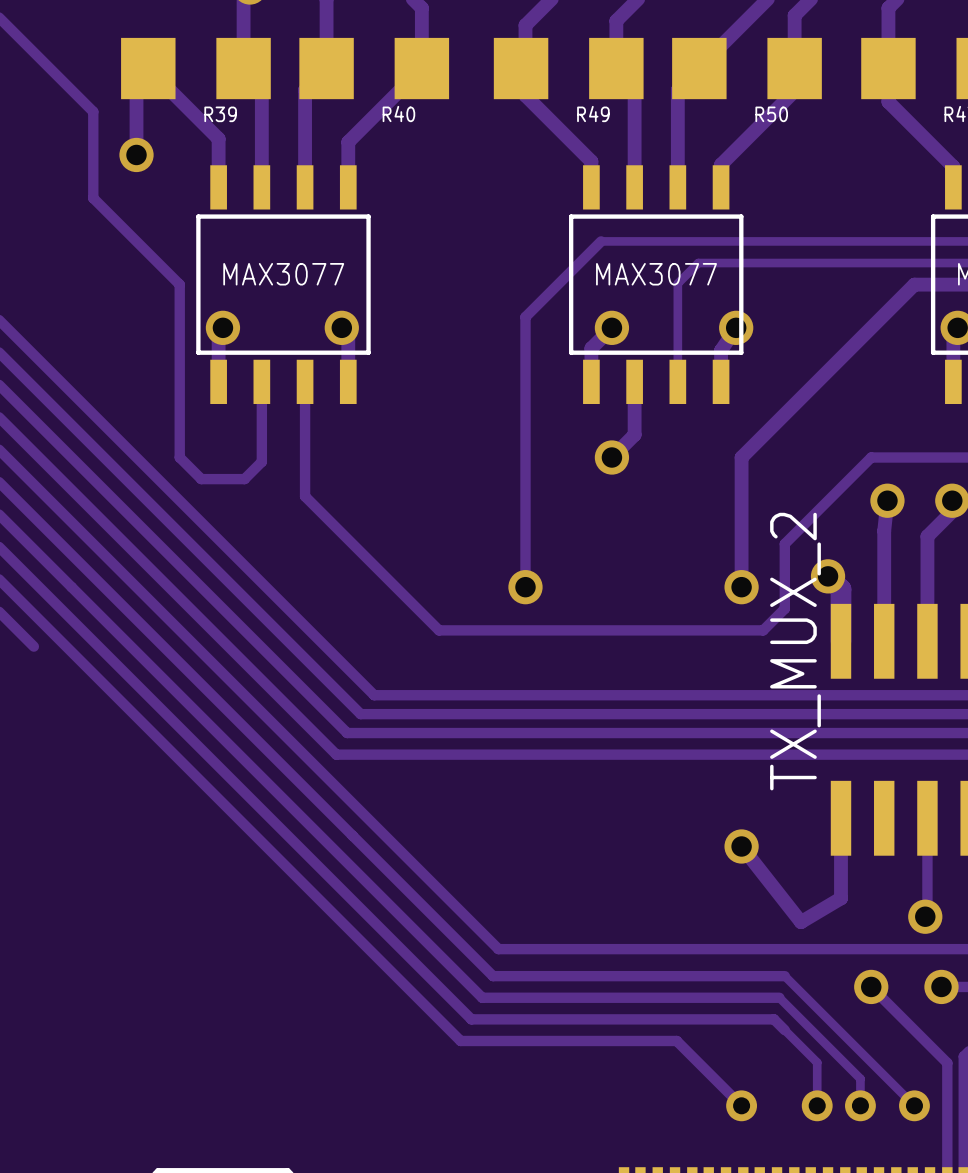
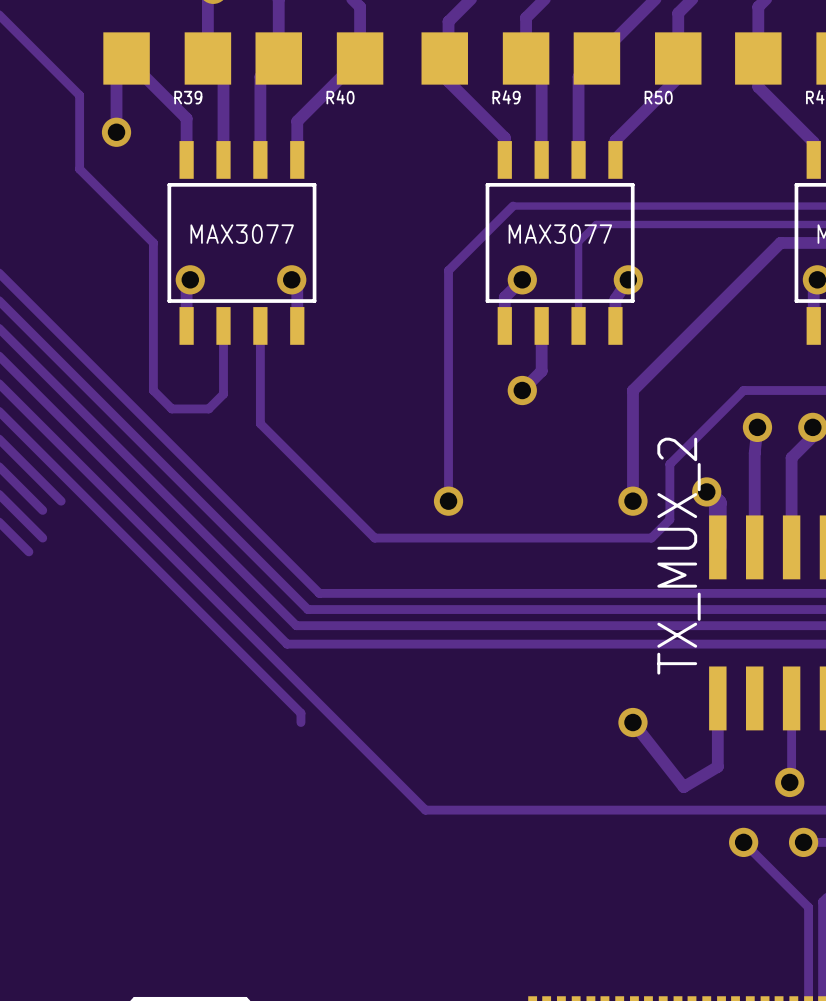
track: (71, 587) (482, 997) (779, 997) (860, 1078) (860, 1105) -> none
track: (50, 597) (471, 1019) (774, 1019) (817, 1062) (817, 1105) -> none
track: (50, 630) (460, 1040) (676, 1040) (741, 1105) -> none
track: (352, 835) (493, 976) (784, 976) (914, 1105) -> (300, 713) (300, 722)
via: (741, 1105) -> none
via: (817, 1105) -> none
via: (860, 1105) -> none
via: (914, 1105) -> none

